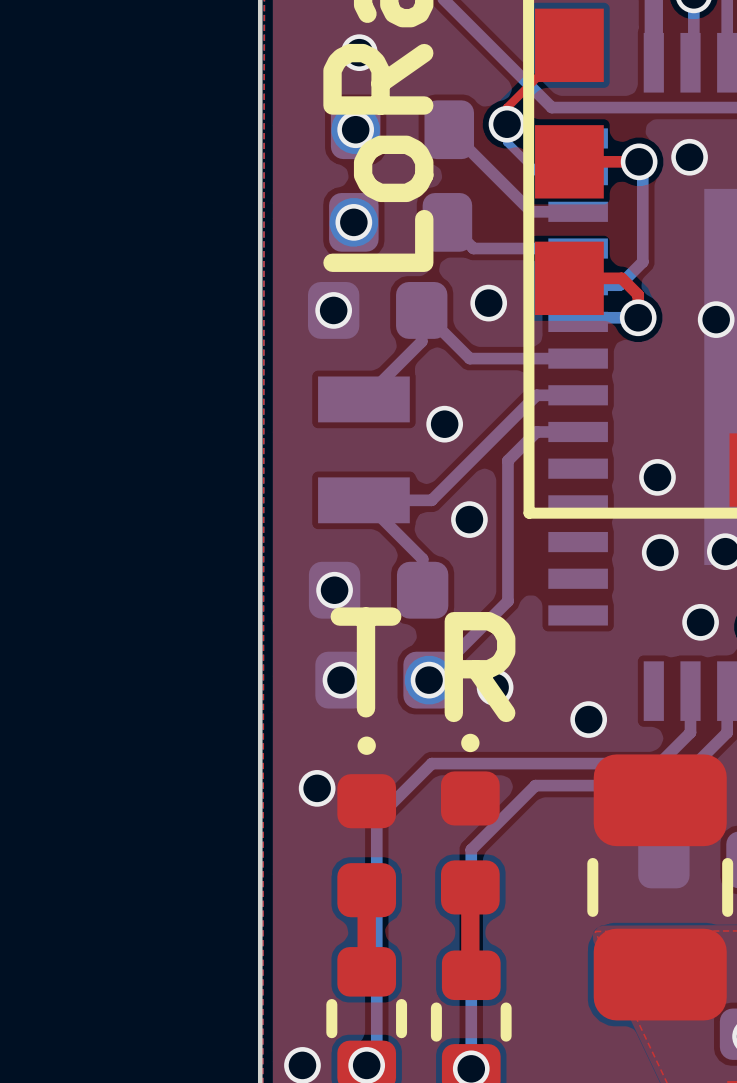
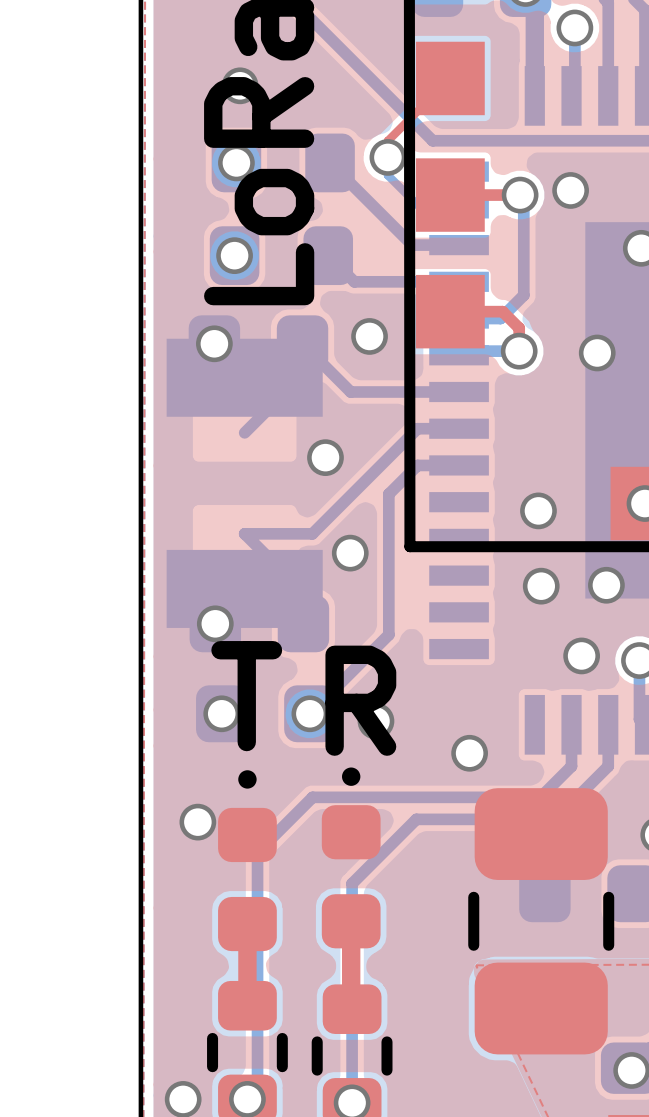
part footprint: [318, 376, 410, 524] -> [166, 338, 323, 628]

